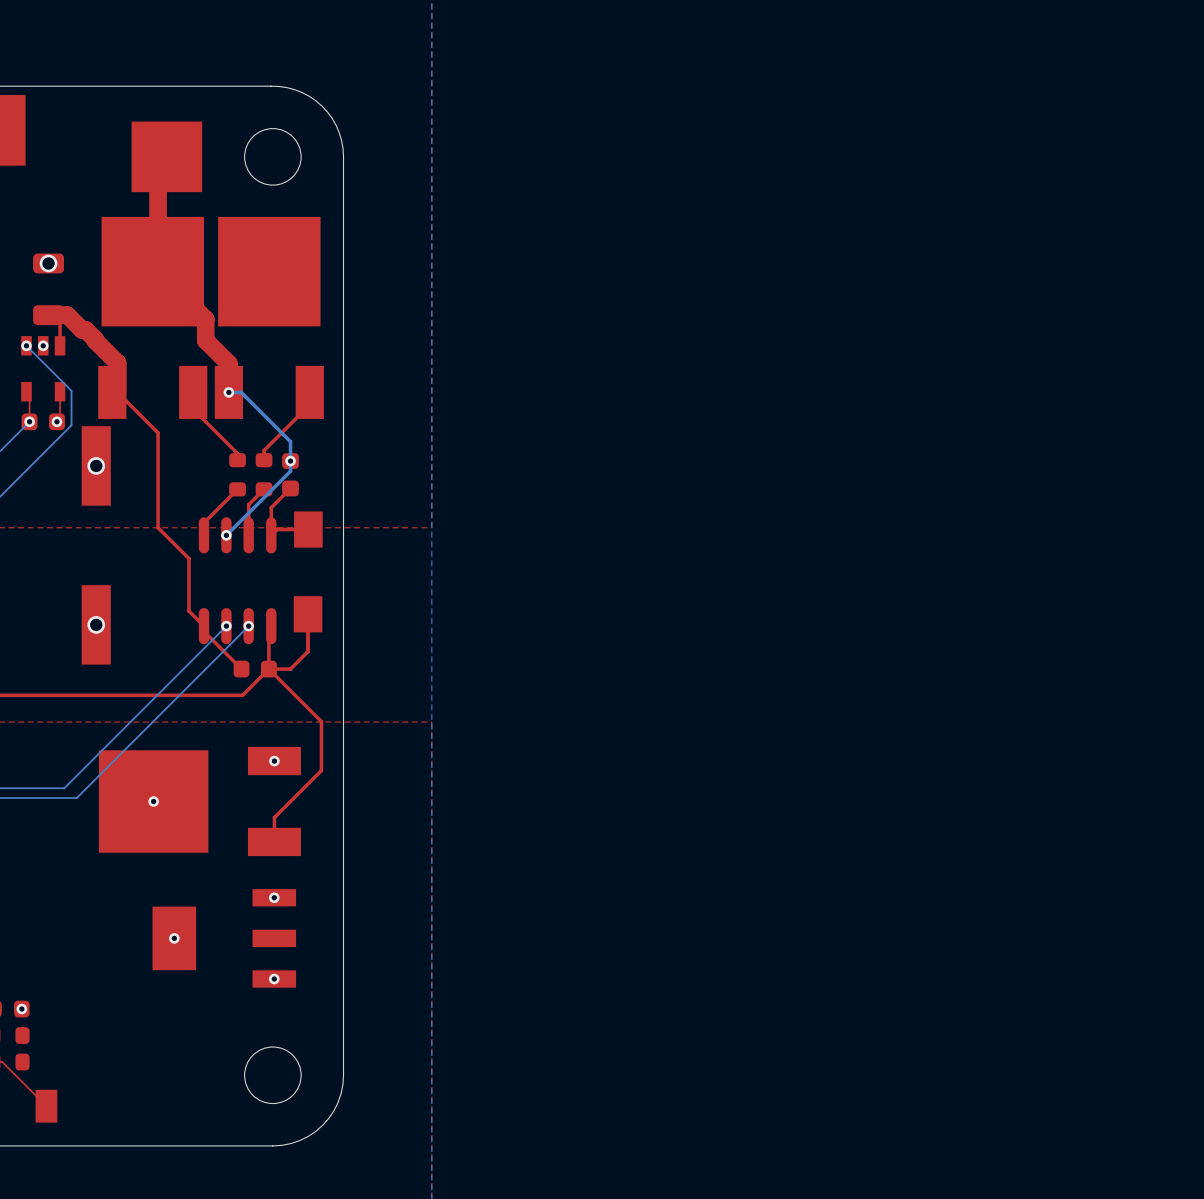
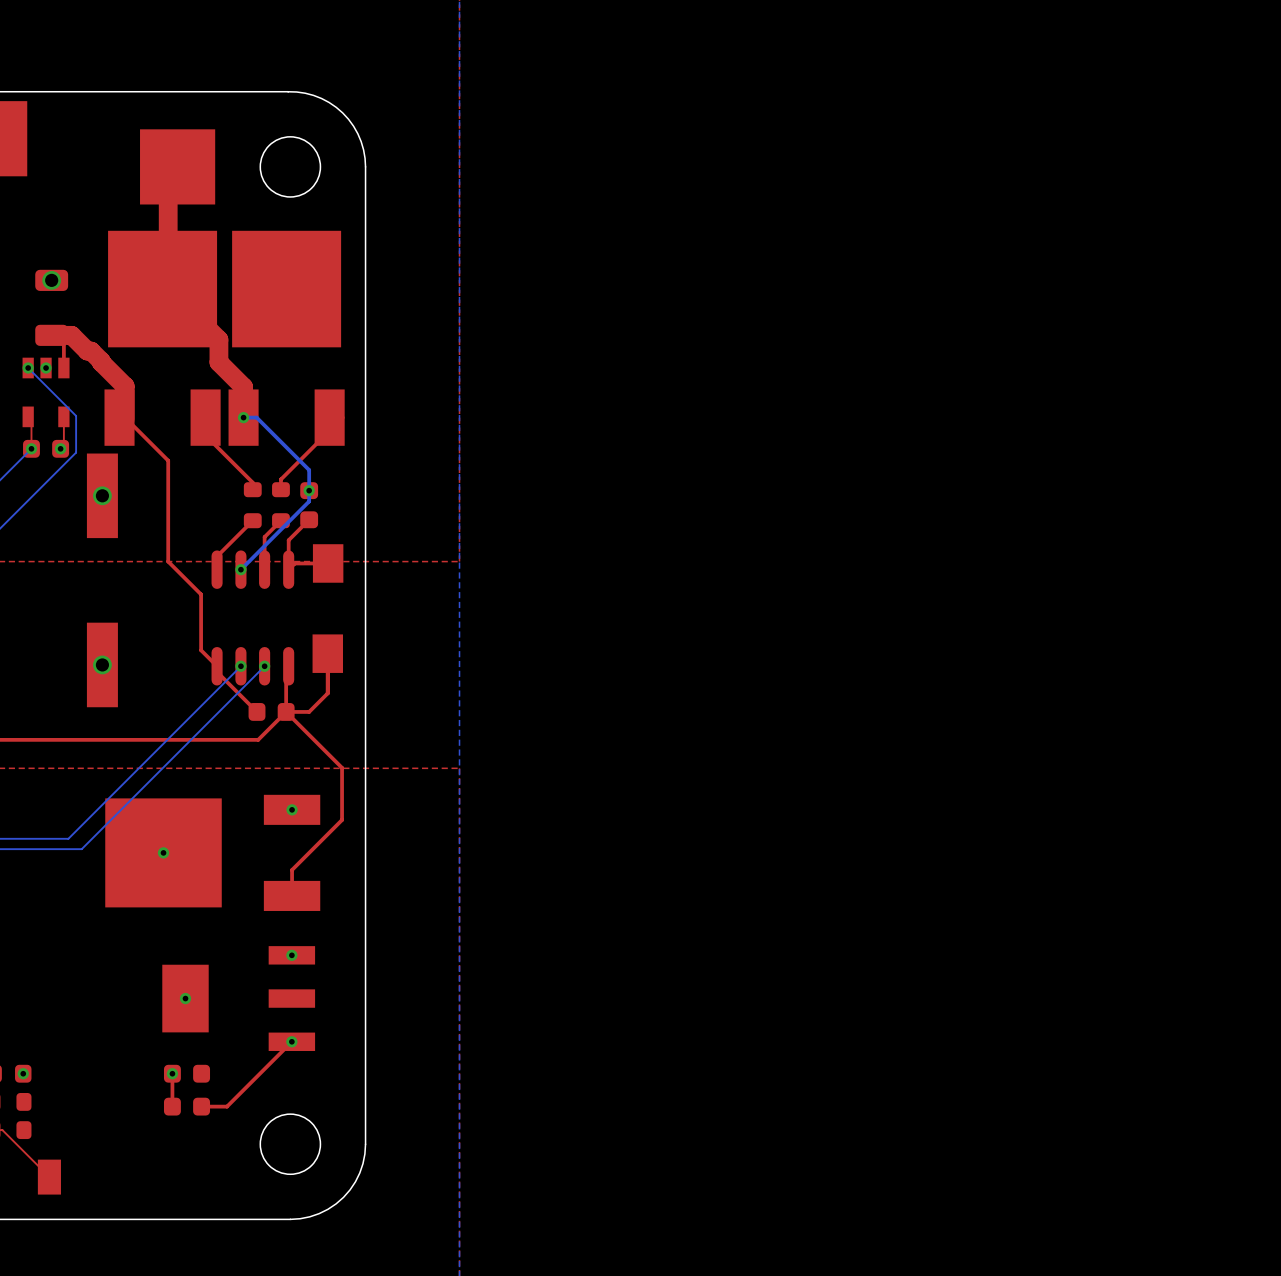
top track: none -> (291, 1041) (227, 1106) (201, 1106)
top track: none -> (172, 1073) (172, 1106)
via: none -> (172, 1073)
part: none -> (187, 1073)
part: none -> (187, 1106)

